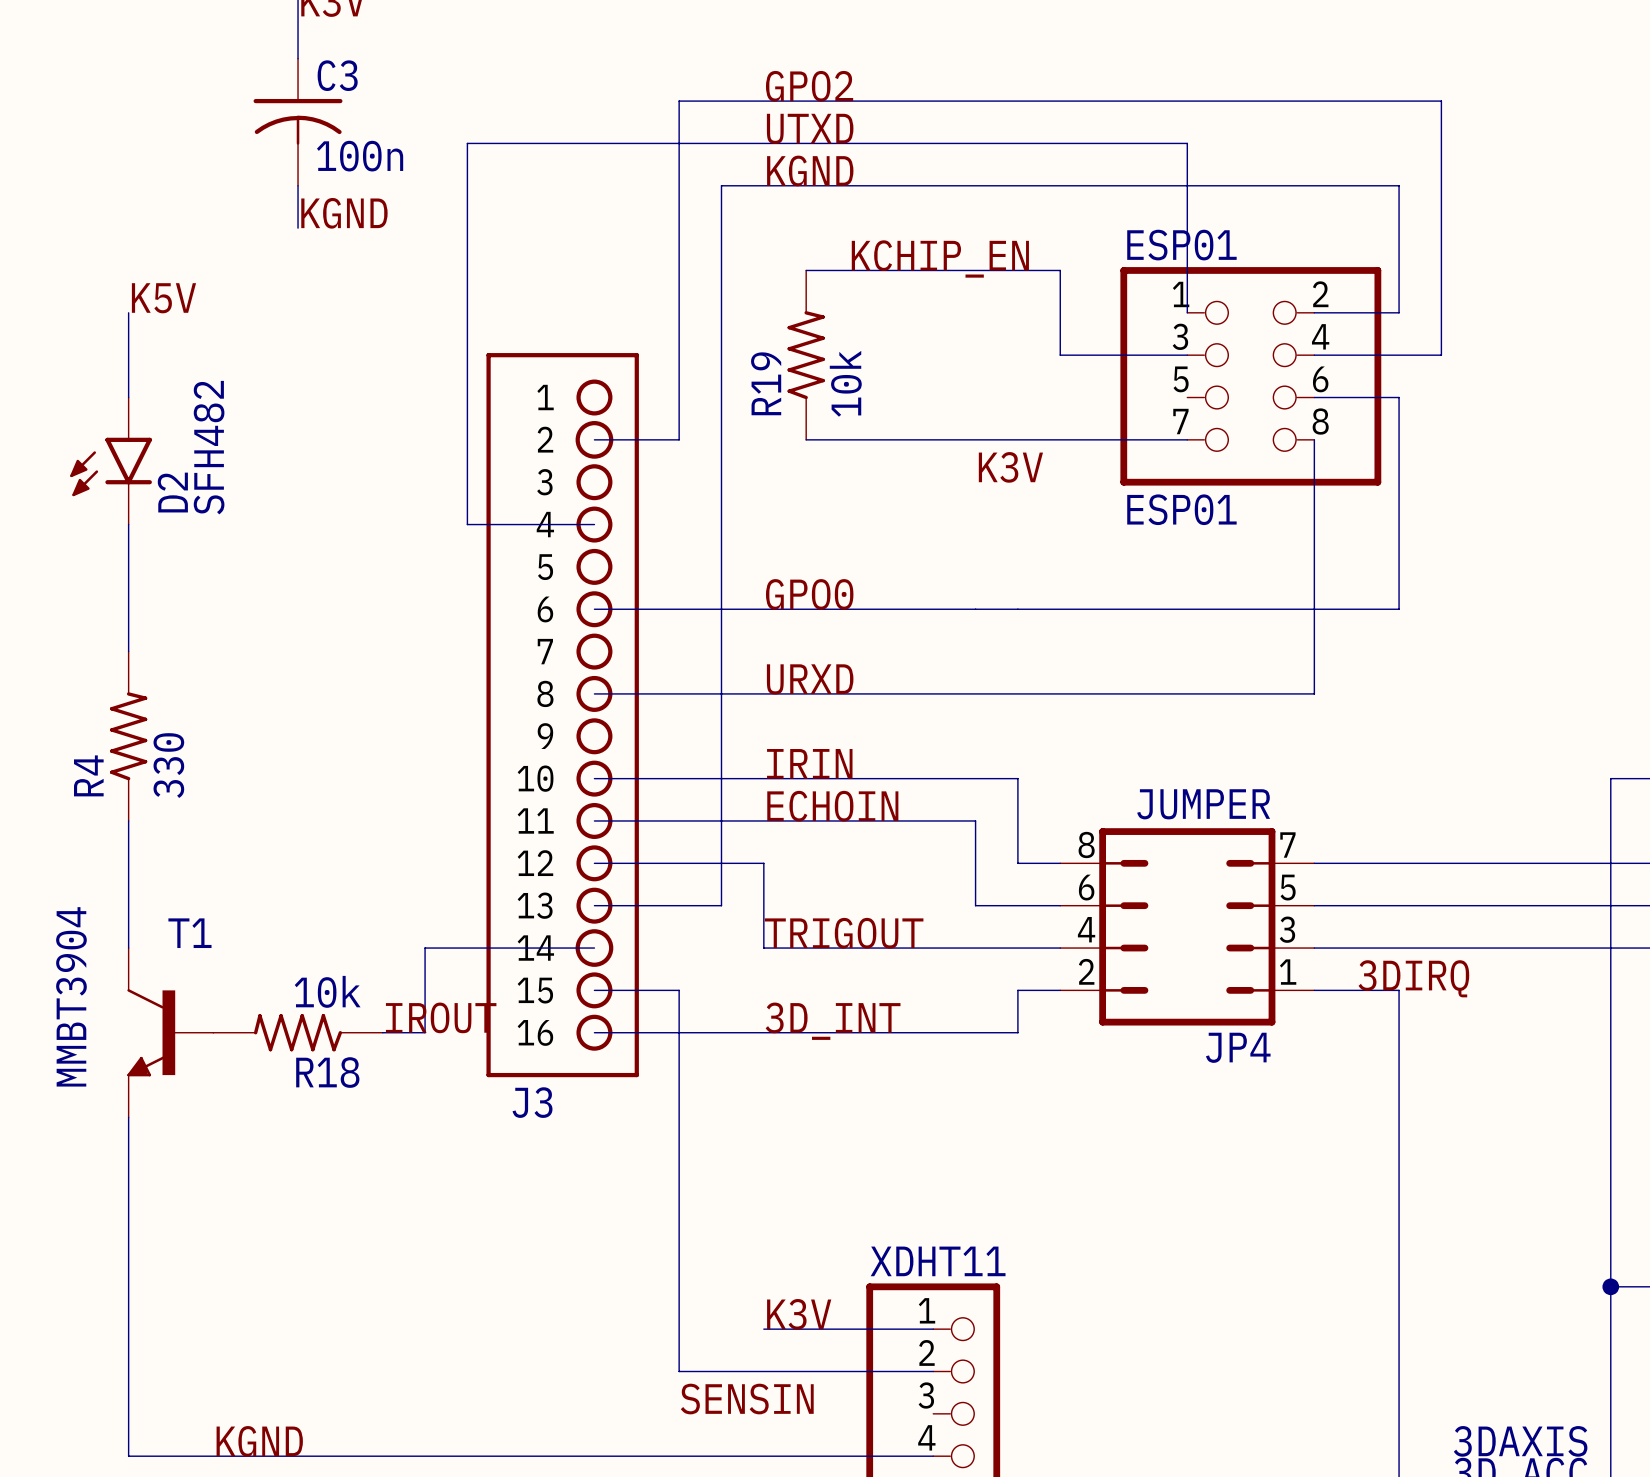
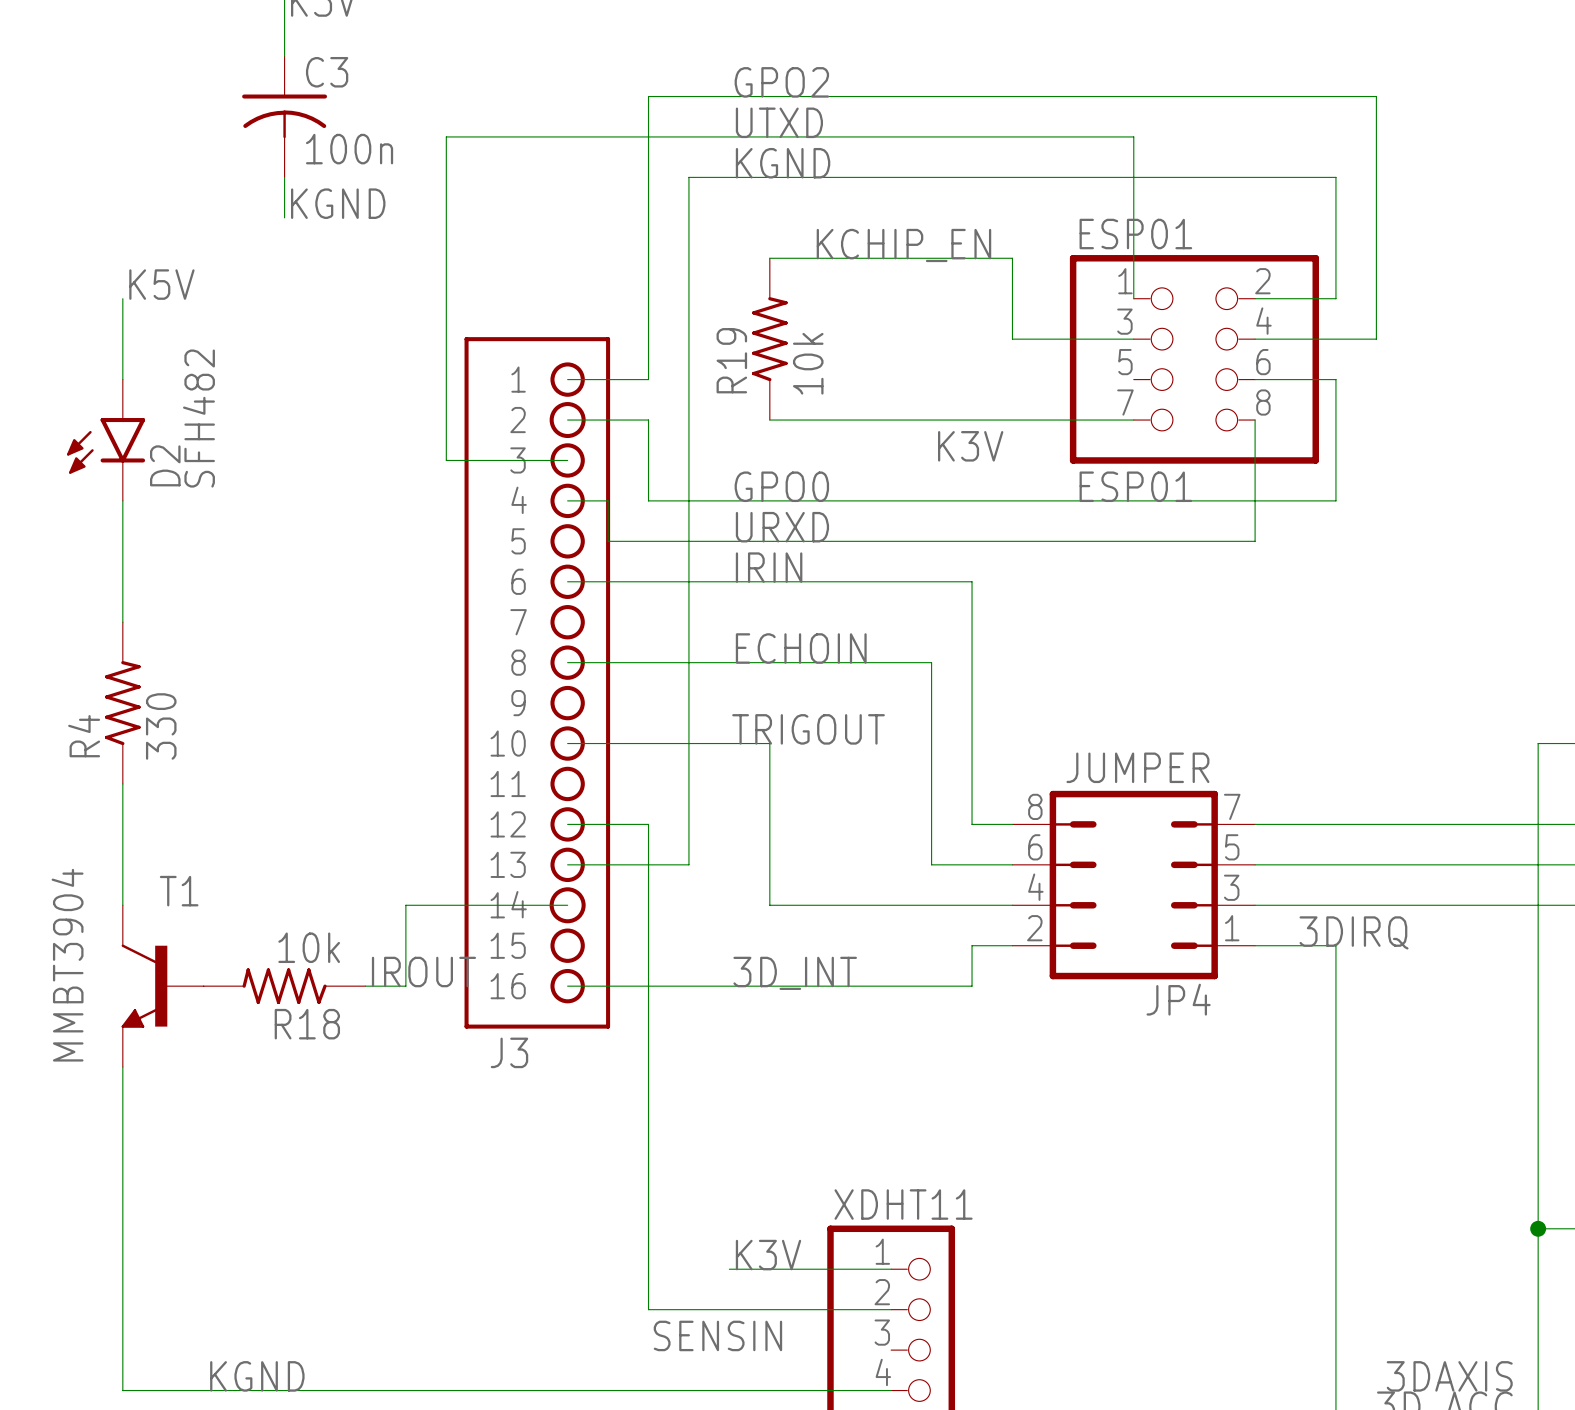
wire: (679, 397) (679, 439) -> (648, 379) (567, 379)
wire: (467, 482) (467, 524) (594, 524) -> (446, 460) (567, 460)
label: none -> GPO0 (781, 486)
wire: (1399, 524) (1399, 609) (1017, 609) -> (1335, 500) (648, 500) (648, 420)
label: none -> URXD (782, 527)
wire: (1314, 566) (1314, 693) (975, 693) -> (1255, 541) (608, 541) (608, 500) (567, 500)
label: GPO0 (809, 594) -> IRIN (769, 567)
label: URXD (810, 679) -> ECHOIN (801, 648)
label: IRIN (809, 763) -> TRIGOUT (808, 729)
wire: (806, 778) (1017, 778) -> (972, 581) (972, 743)
wire: none -> (769, 743) (769, 905)
label: ECHOIN (832, 806) -> none
wire: (594, 820) (975, 820) -> (931, 662) (931, 783)
wire: (679, 863) (763, 863) (763, 948) (806, 948) -> (648, 824) (648, 945)
label: TRIGOUT (844, 933) -> none
wire: (594, 990) (679, 990) -> none

